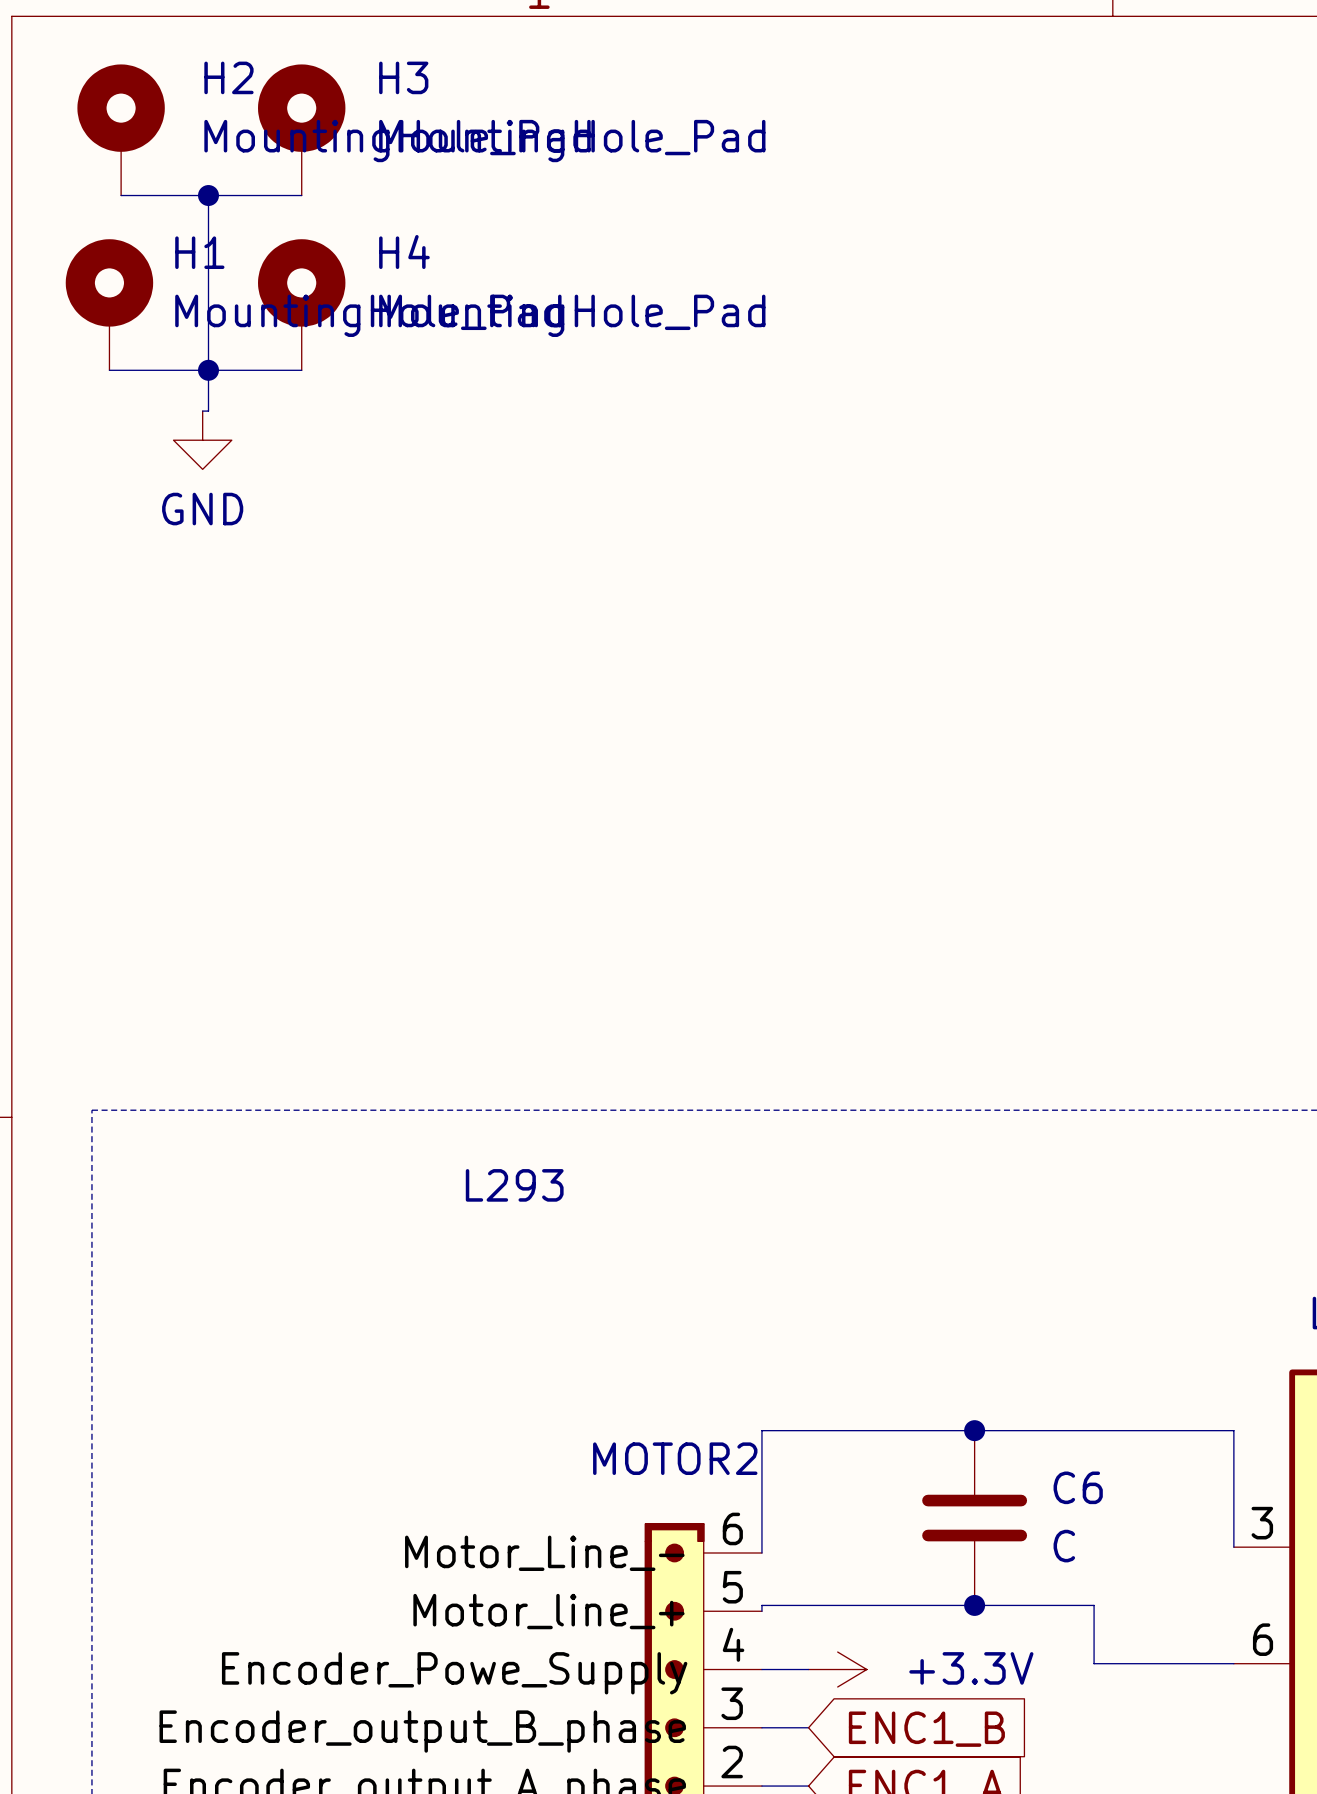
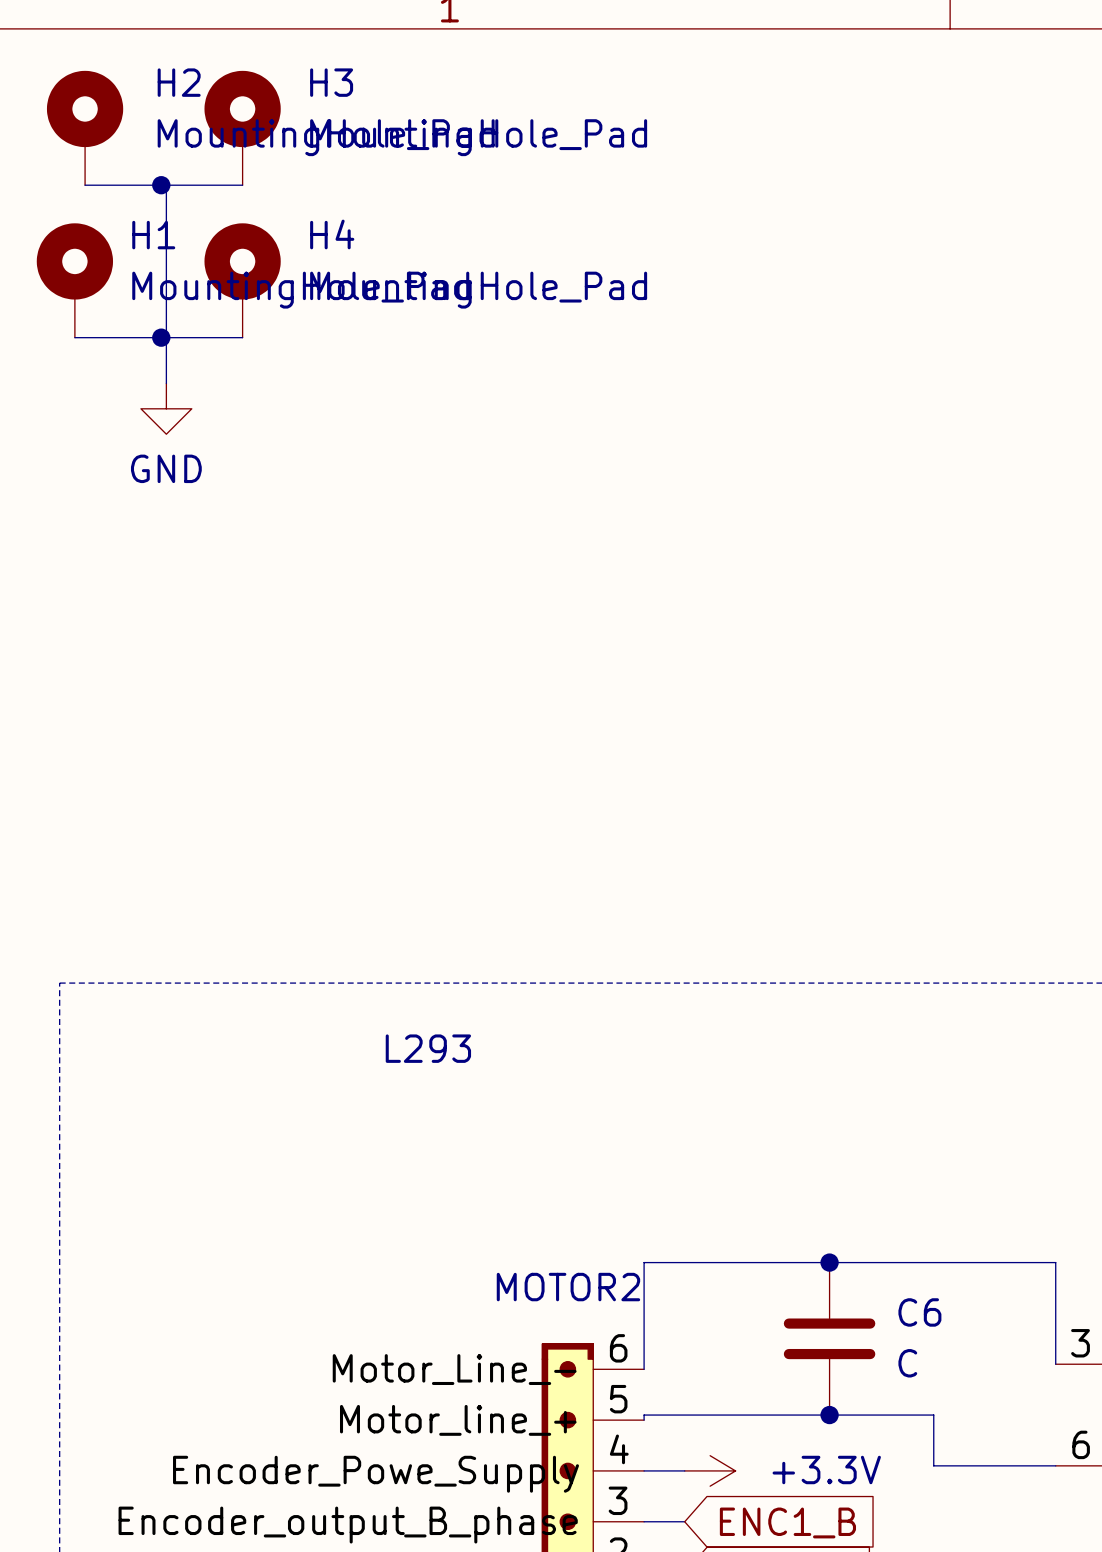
wire: (208, 195) (208, 411) (202, 411) -> none
wire: none -> (166, 185) (166, 383)
power symbol position: GND (202, 440) -> GND (166, 408)

